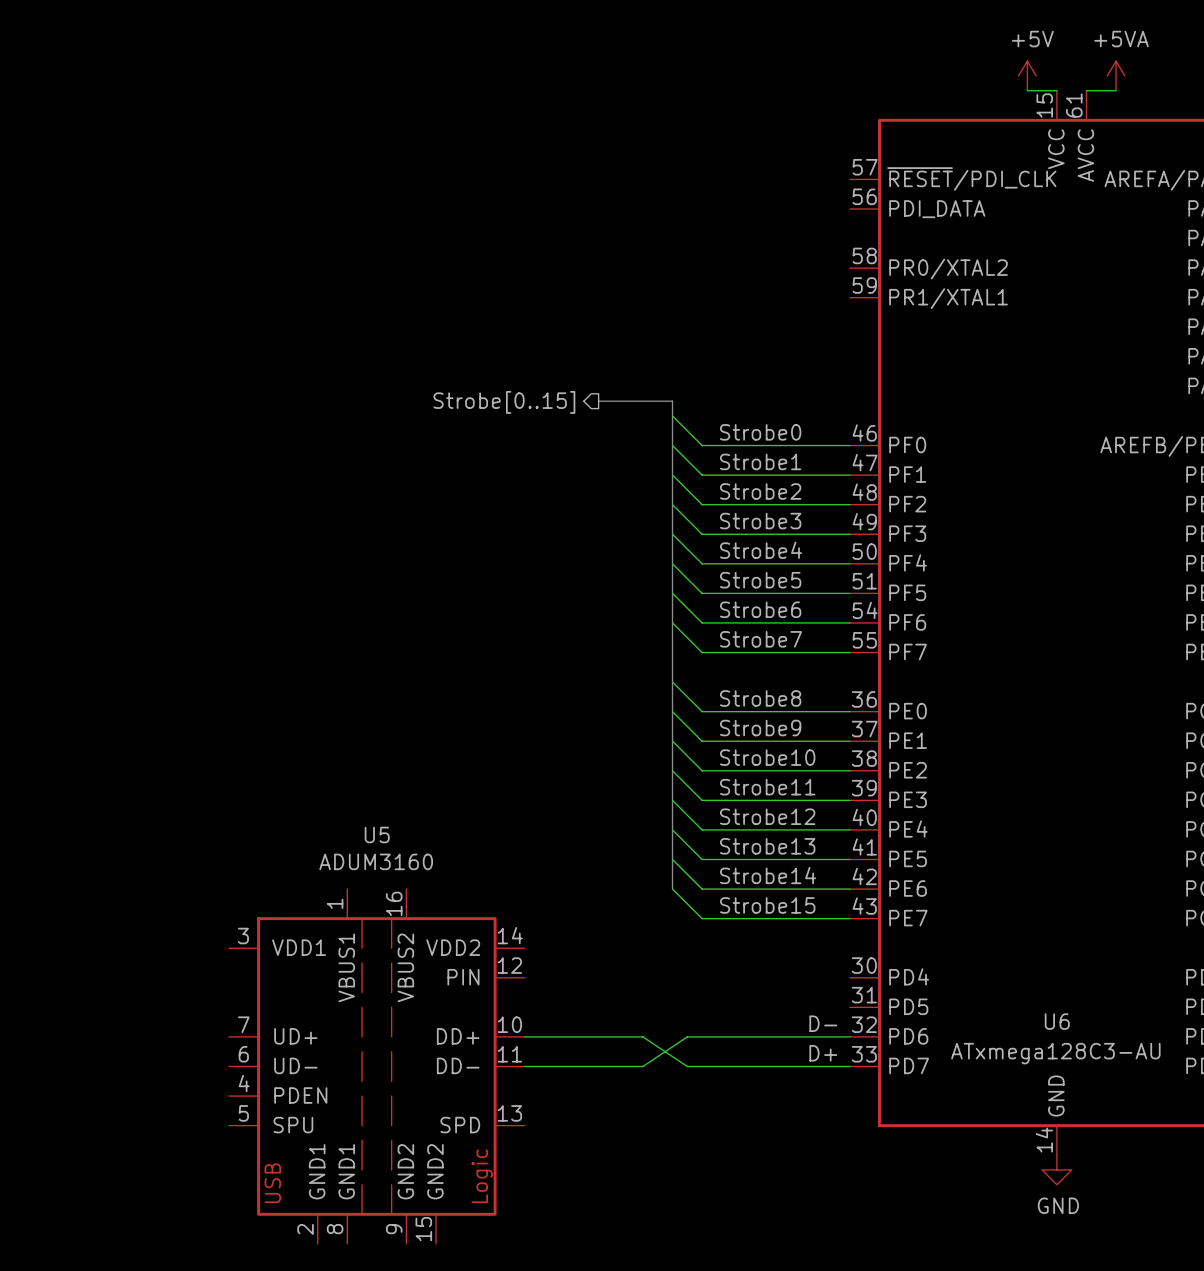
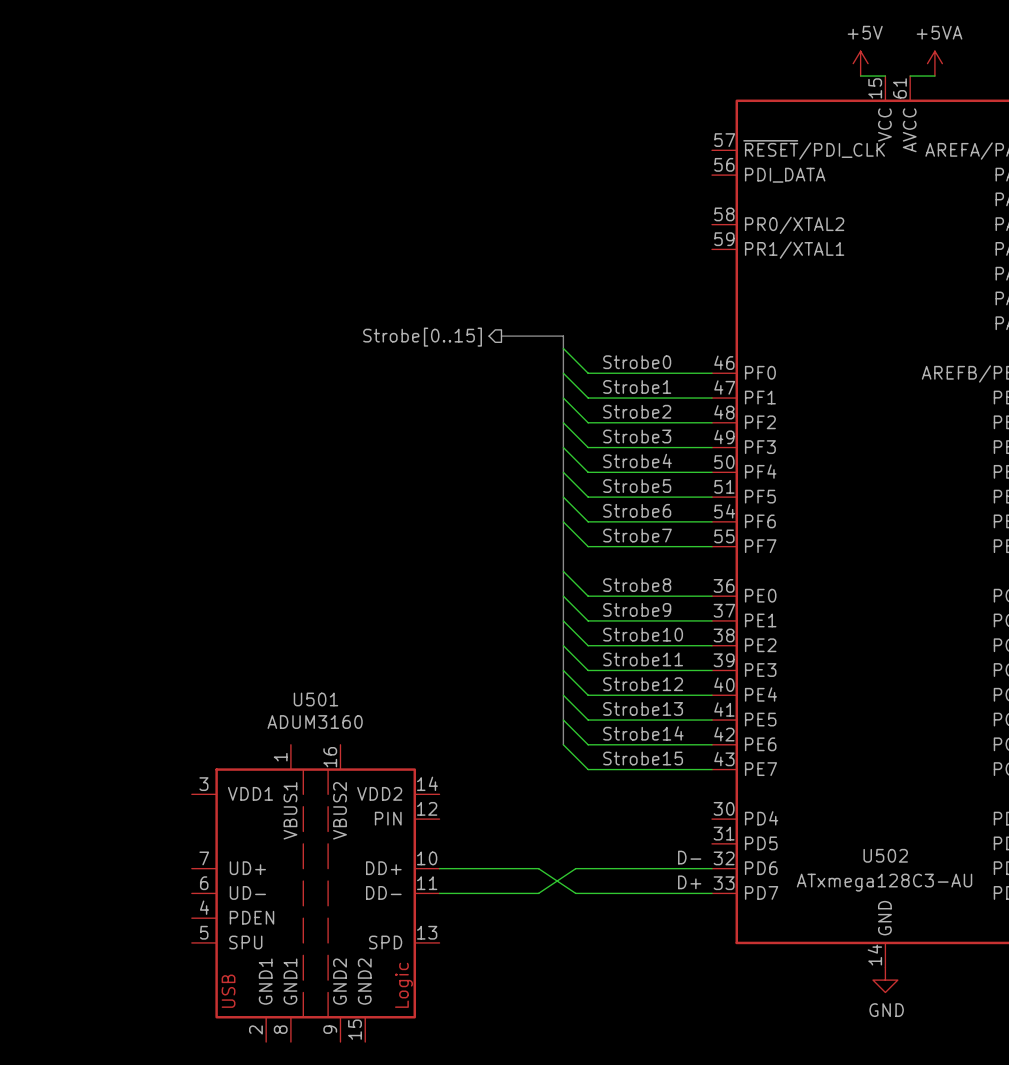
U5 name: U5 (377, 835) -> U501 (315, 699)
U6 name: U6 (1057, 1021) -> U502 (885, 855)

